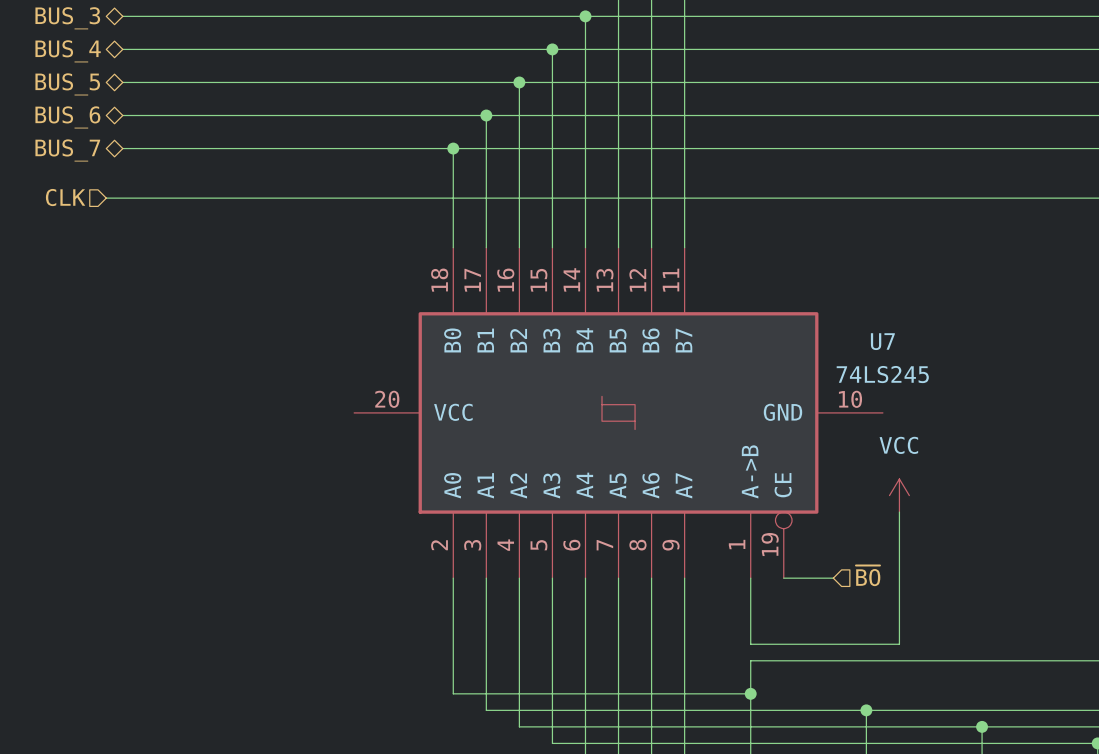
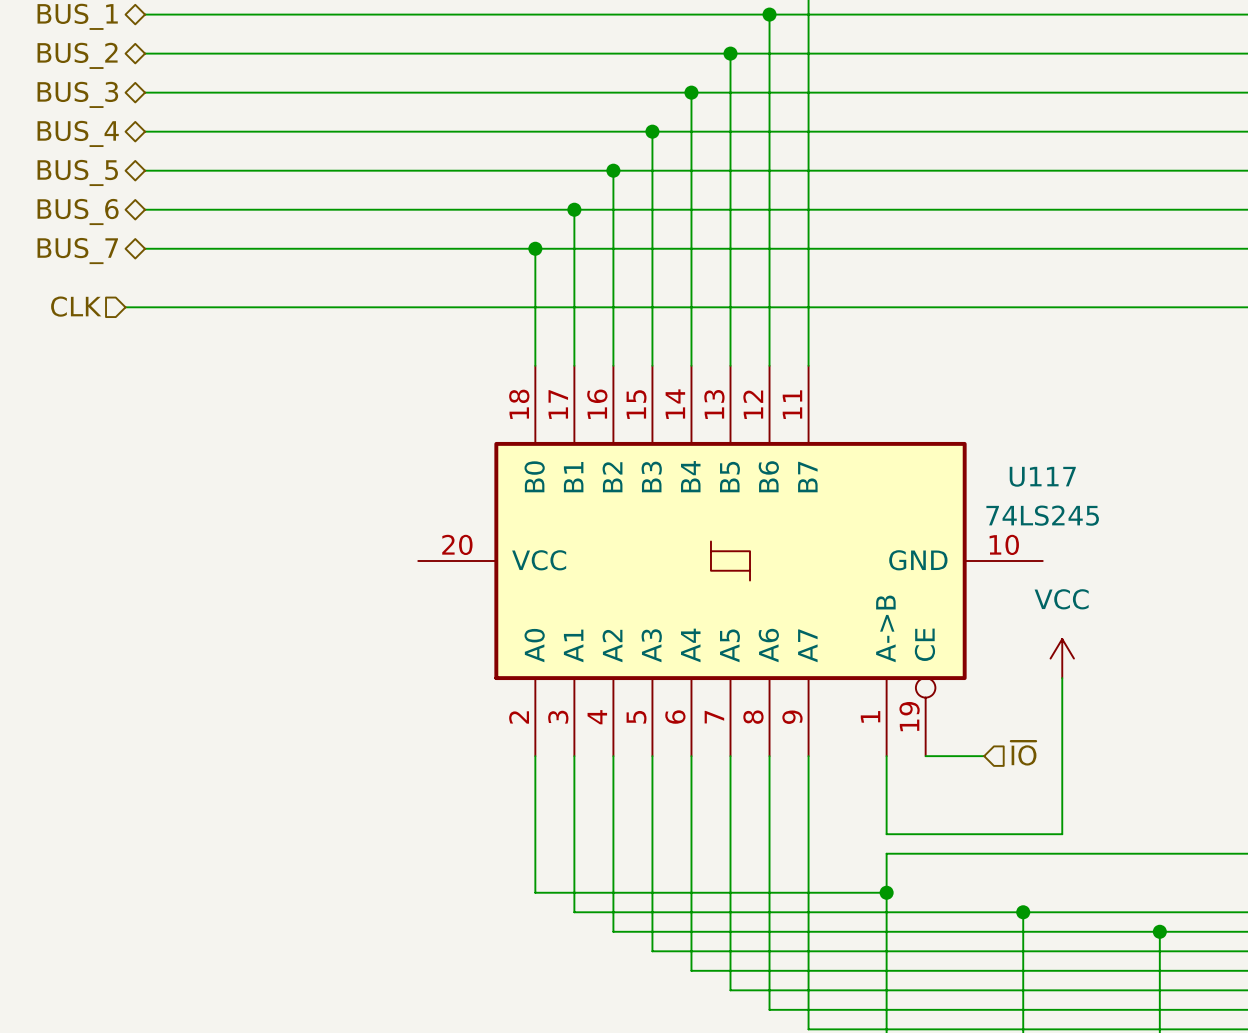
U7 name: U7 (882, 341) -> U117 (1042, 476)
hierarchical label: ~{BO} (868, 575) -> ~{IO} (1023, 753)

